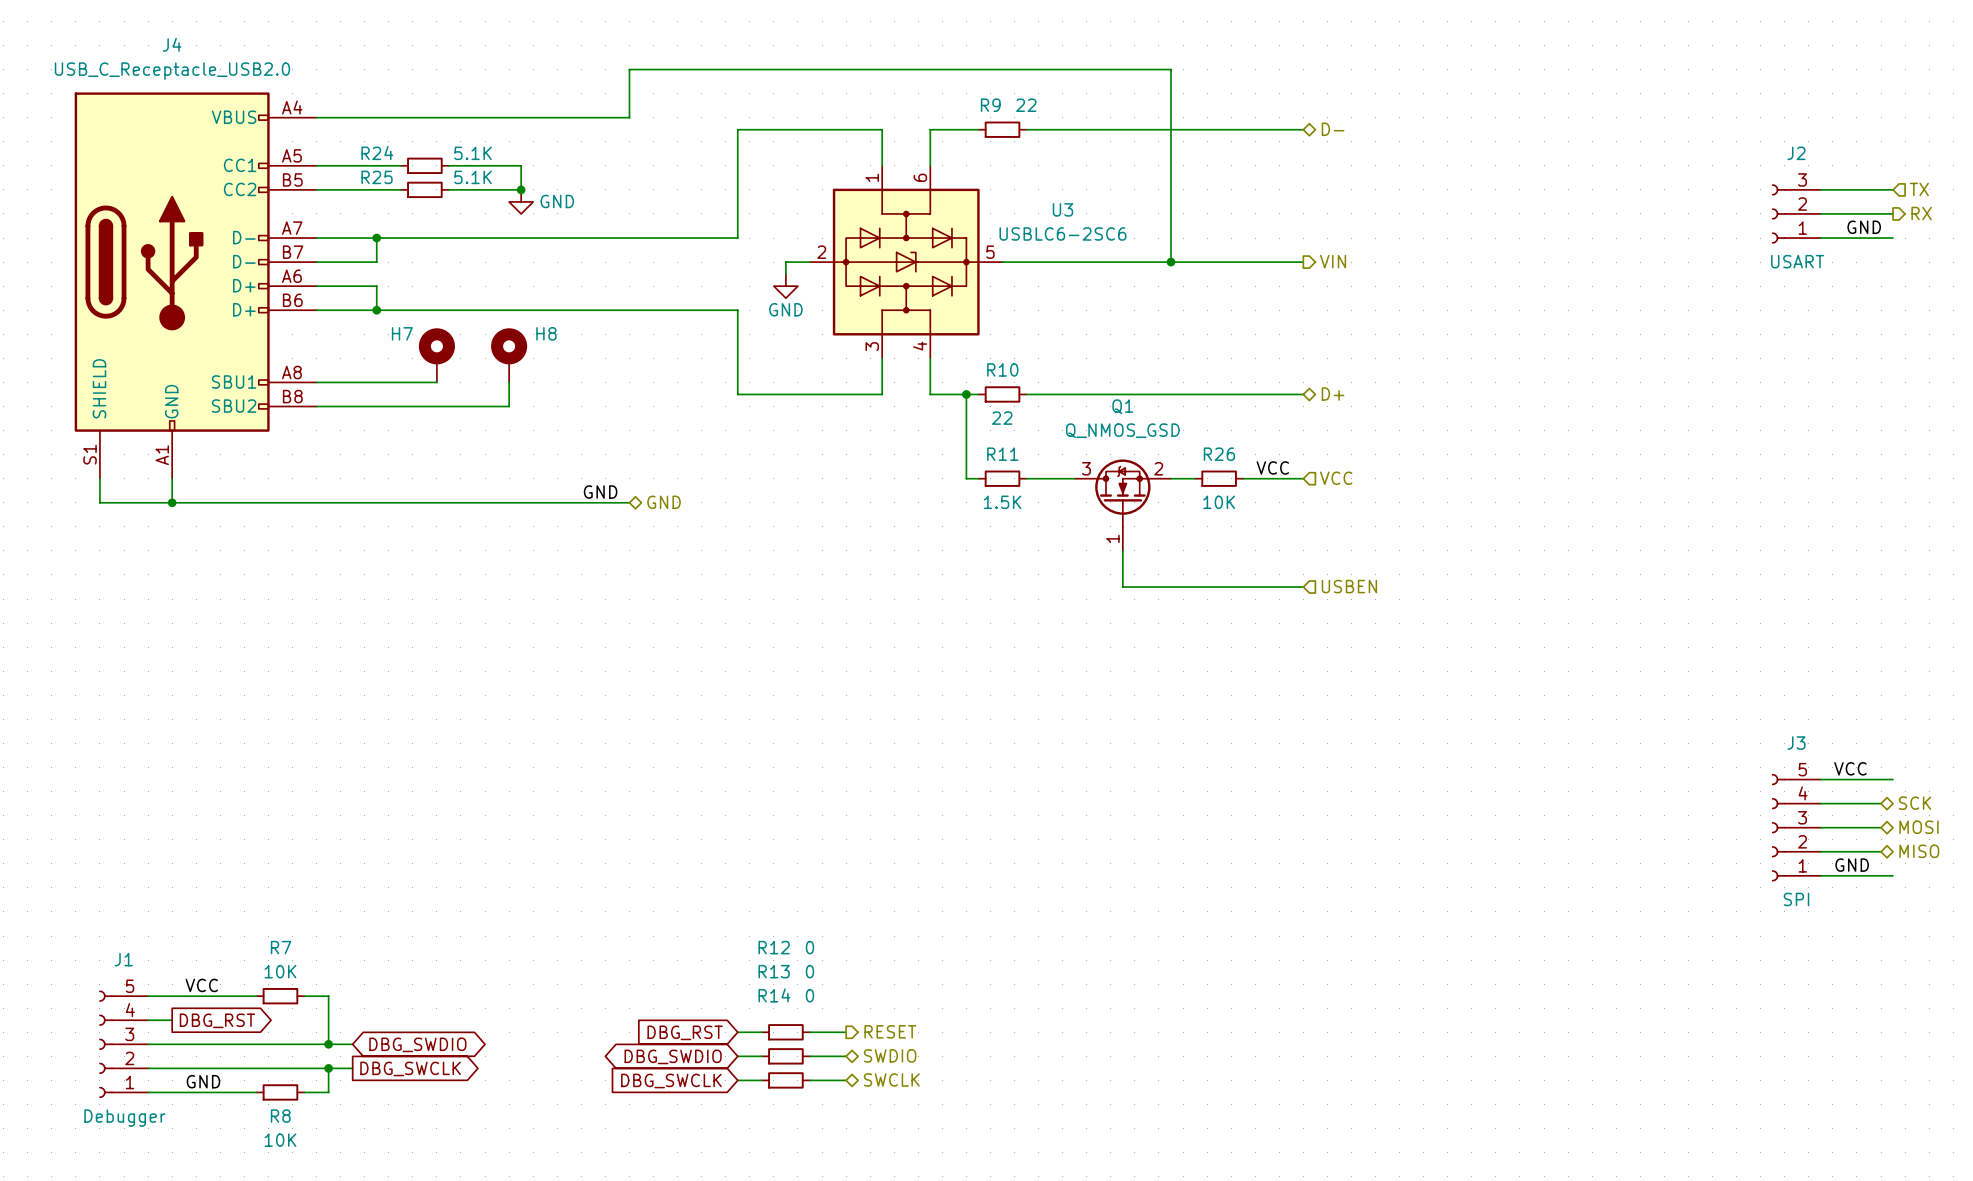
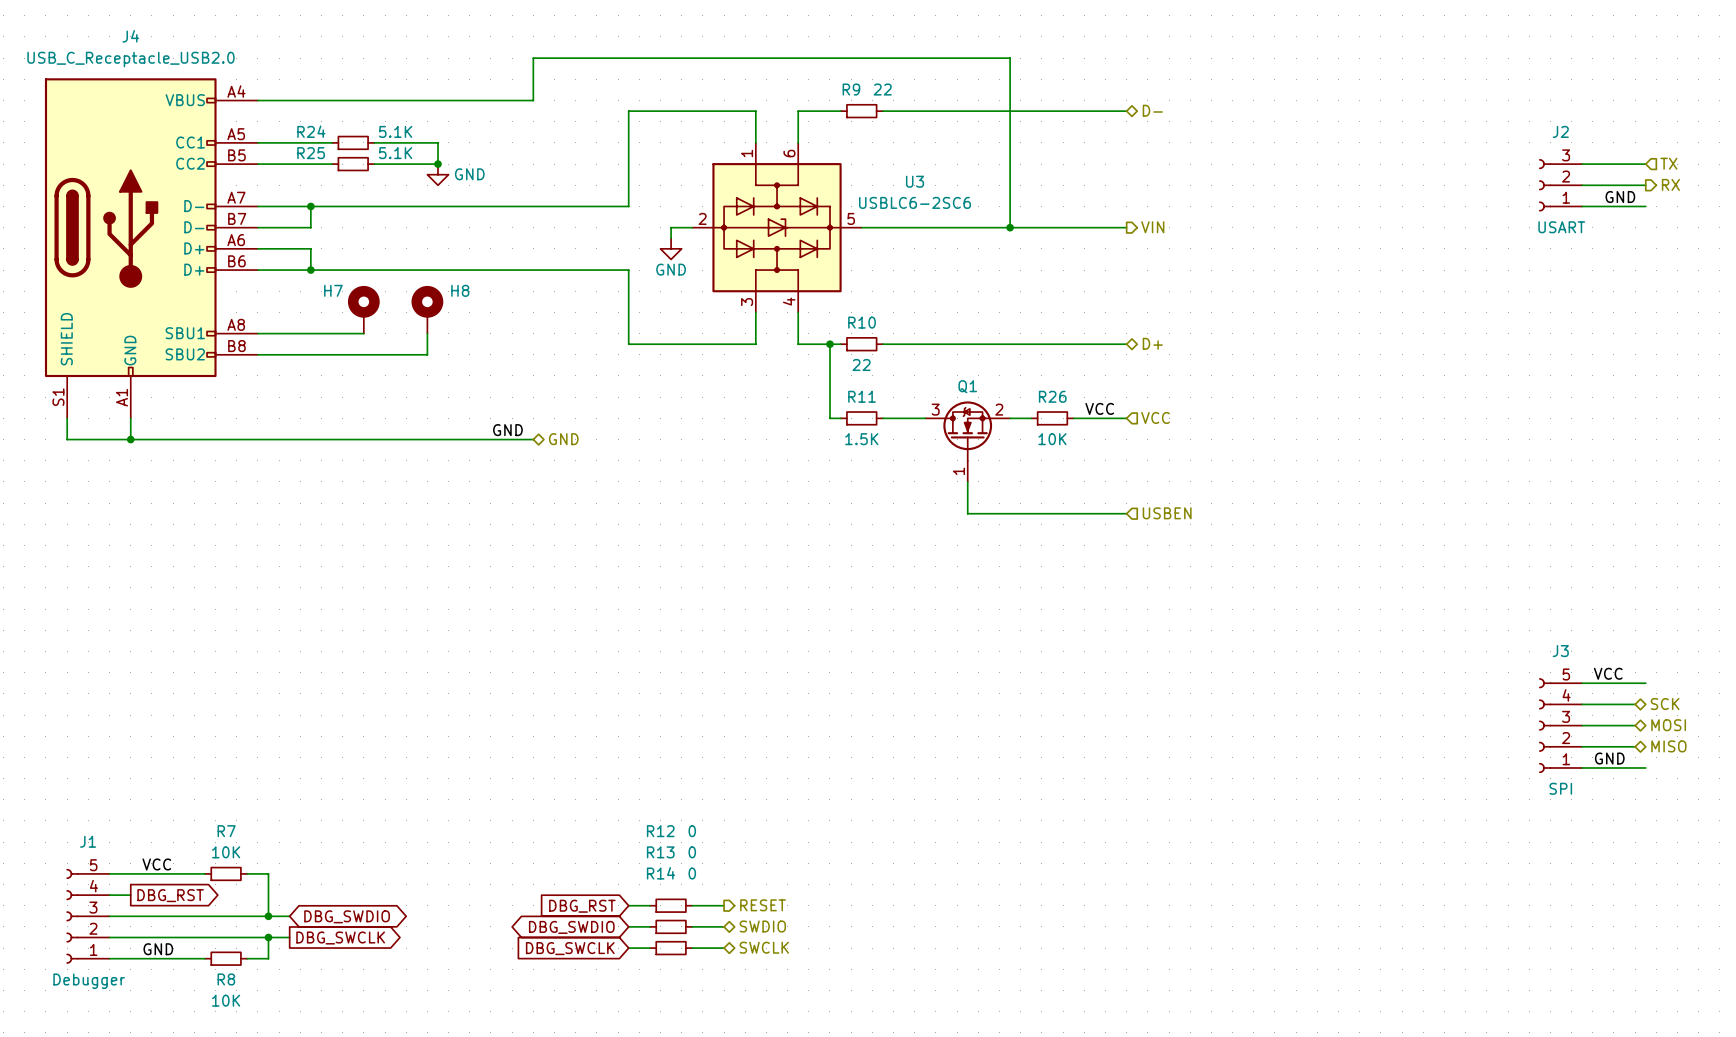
Q1 name position: Q1 (1122, 406) -> Q1 (967, 386)
Q1 value: Q_NMOS_GSD (1122, 430) -> none

